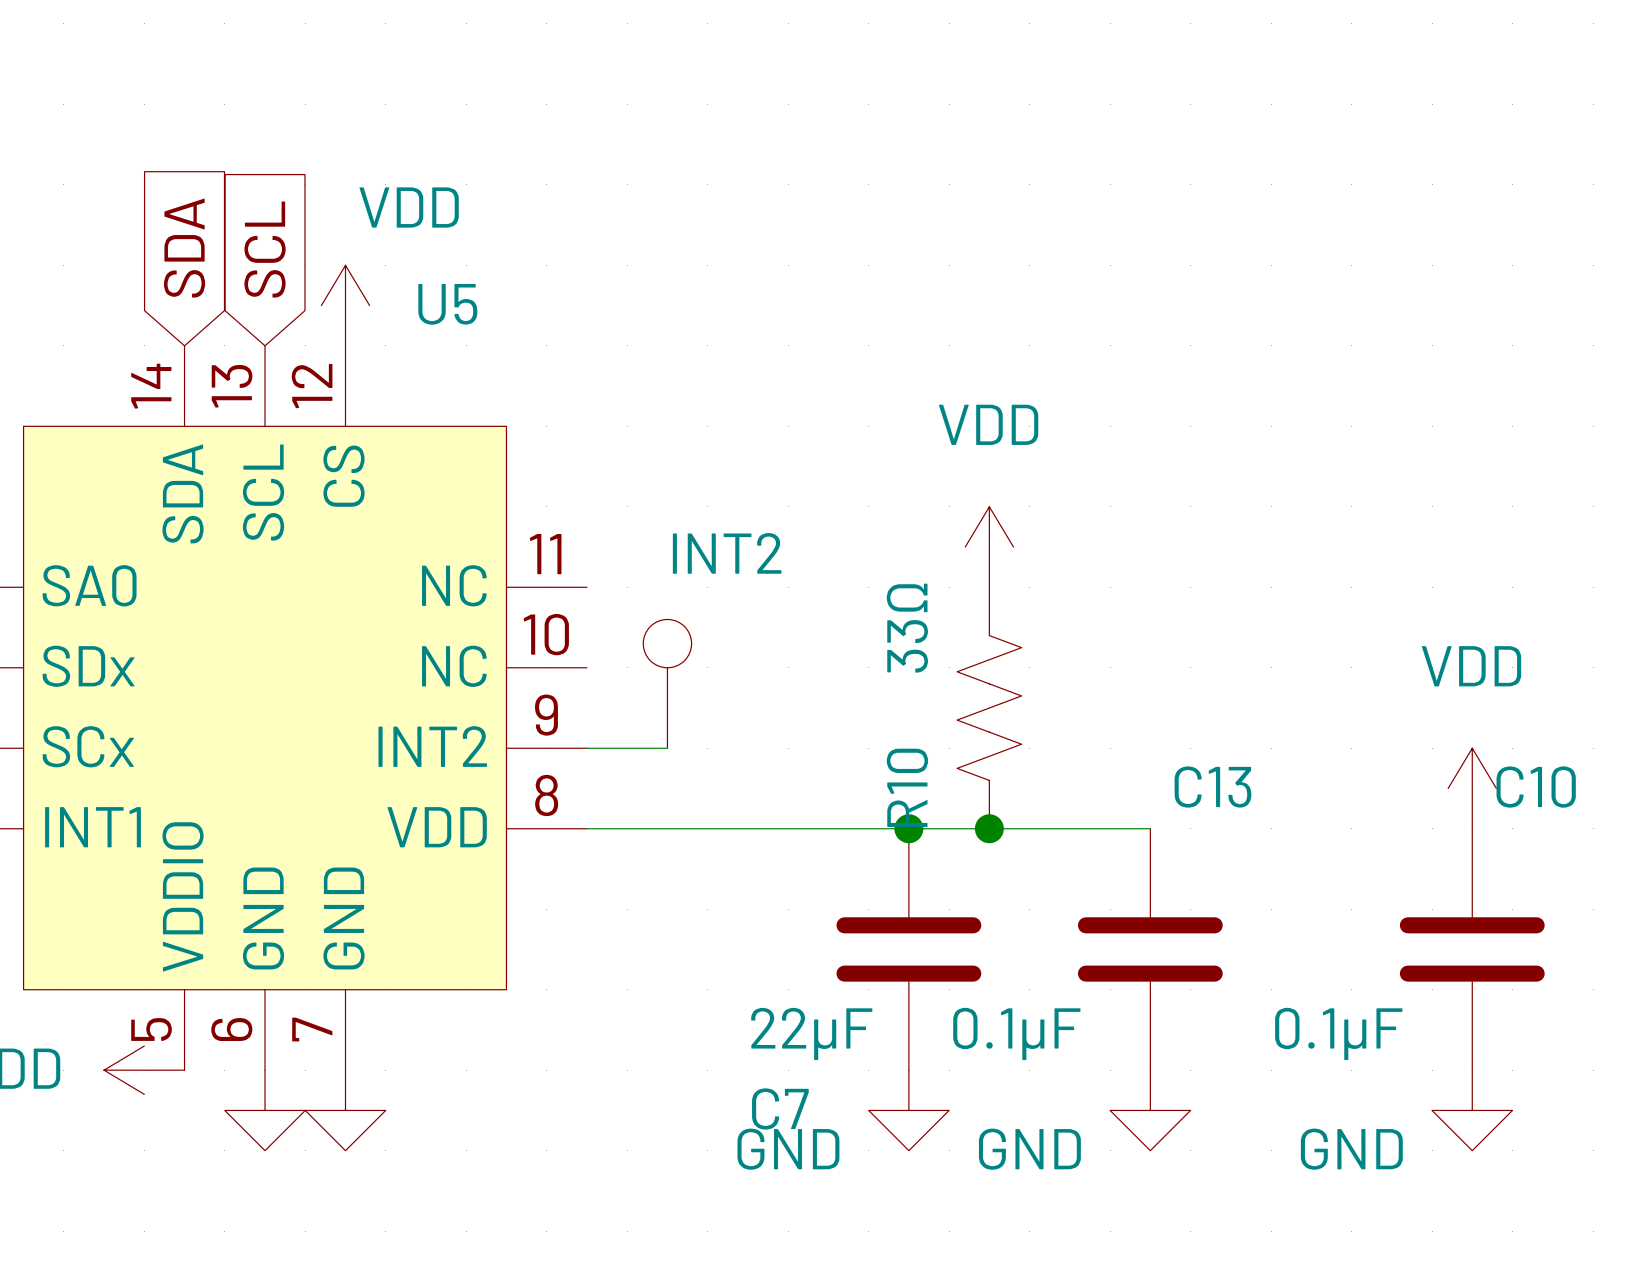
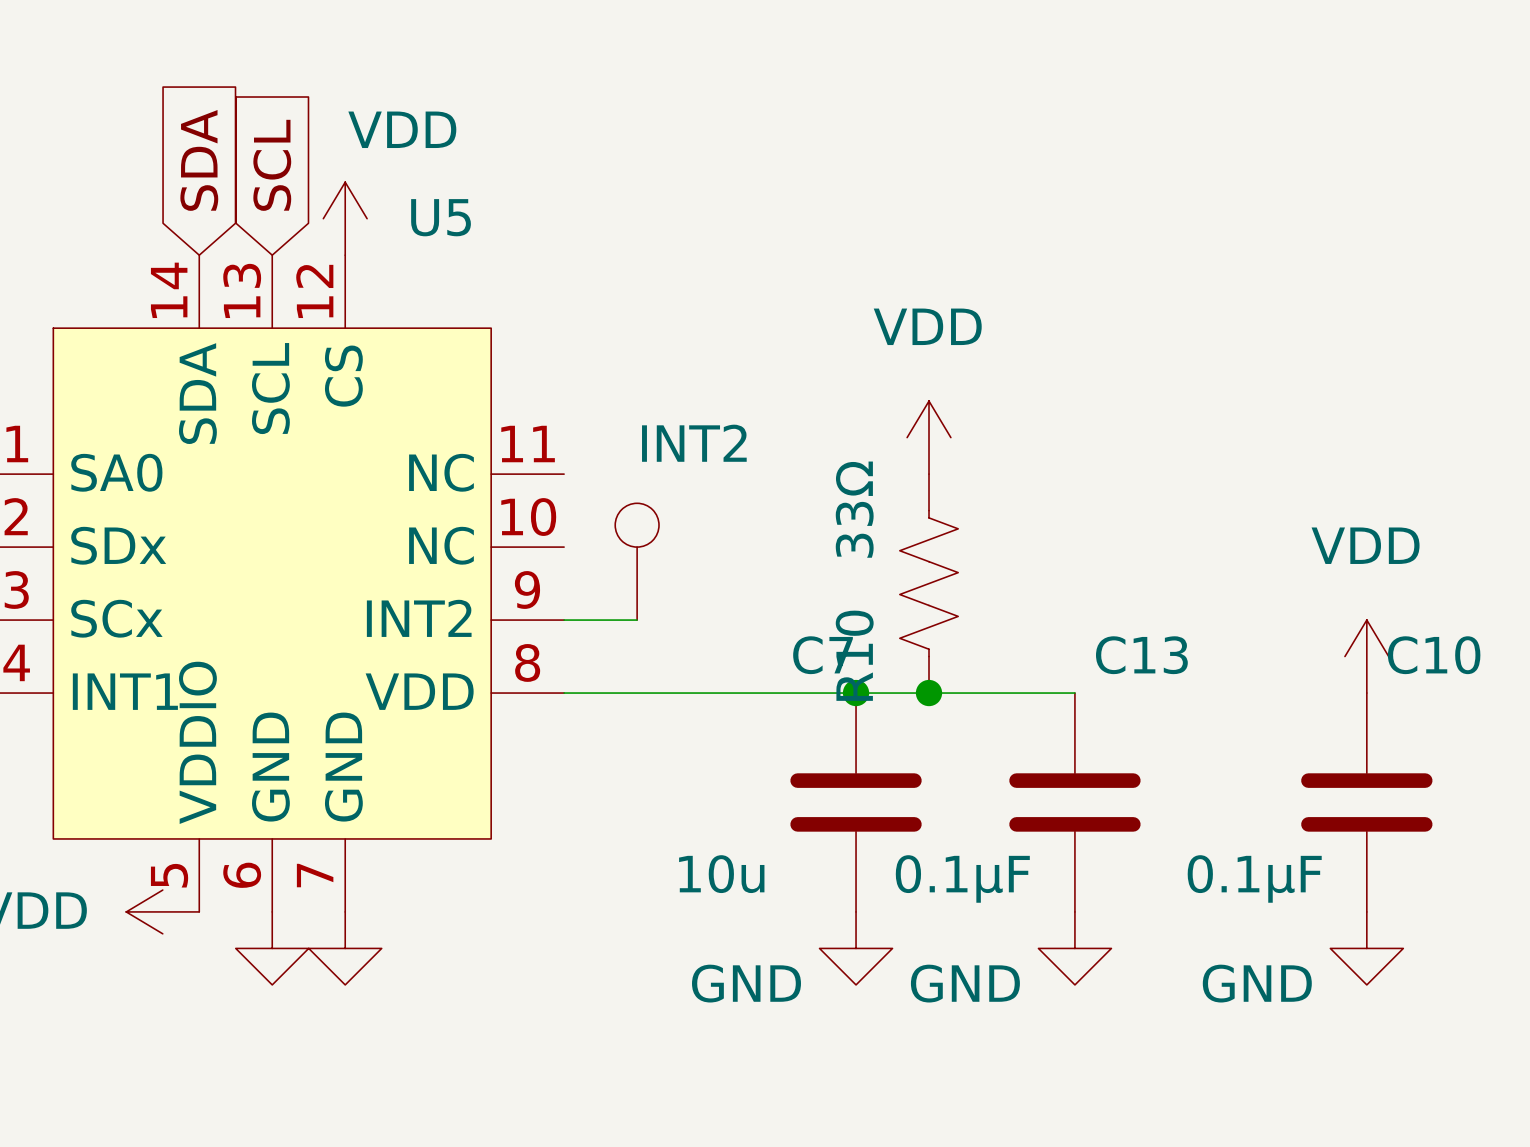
C7 value: 22μF (811, 1033) -> 10u (721, 874)
C7 name position: C7 (780, 1108) -> C7 (823, 655)

